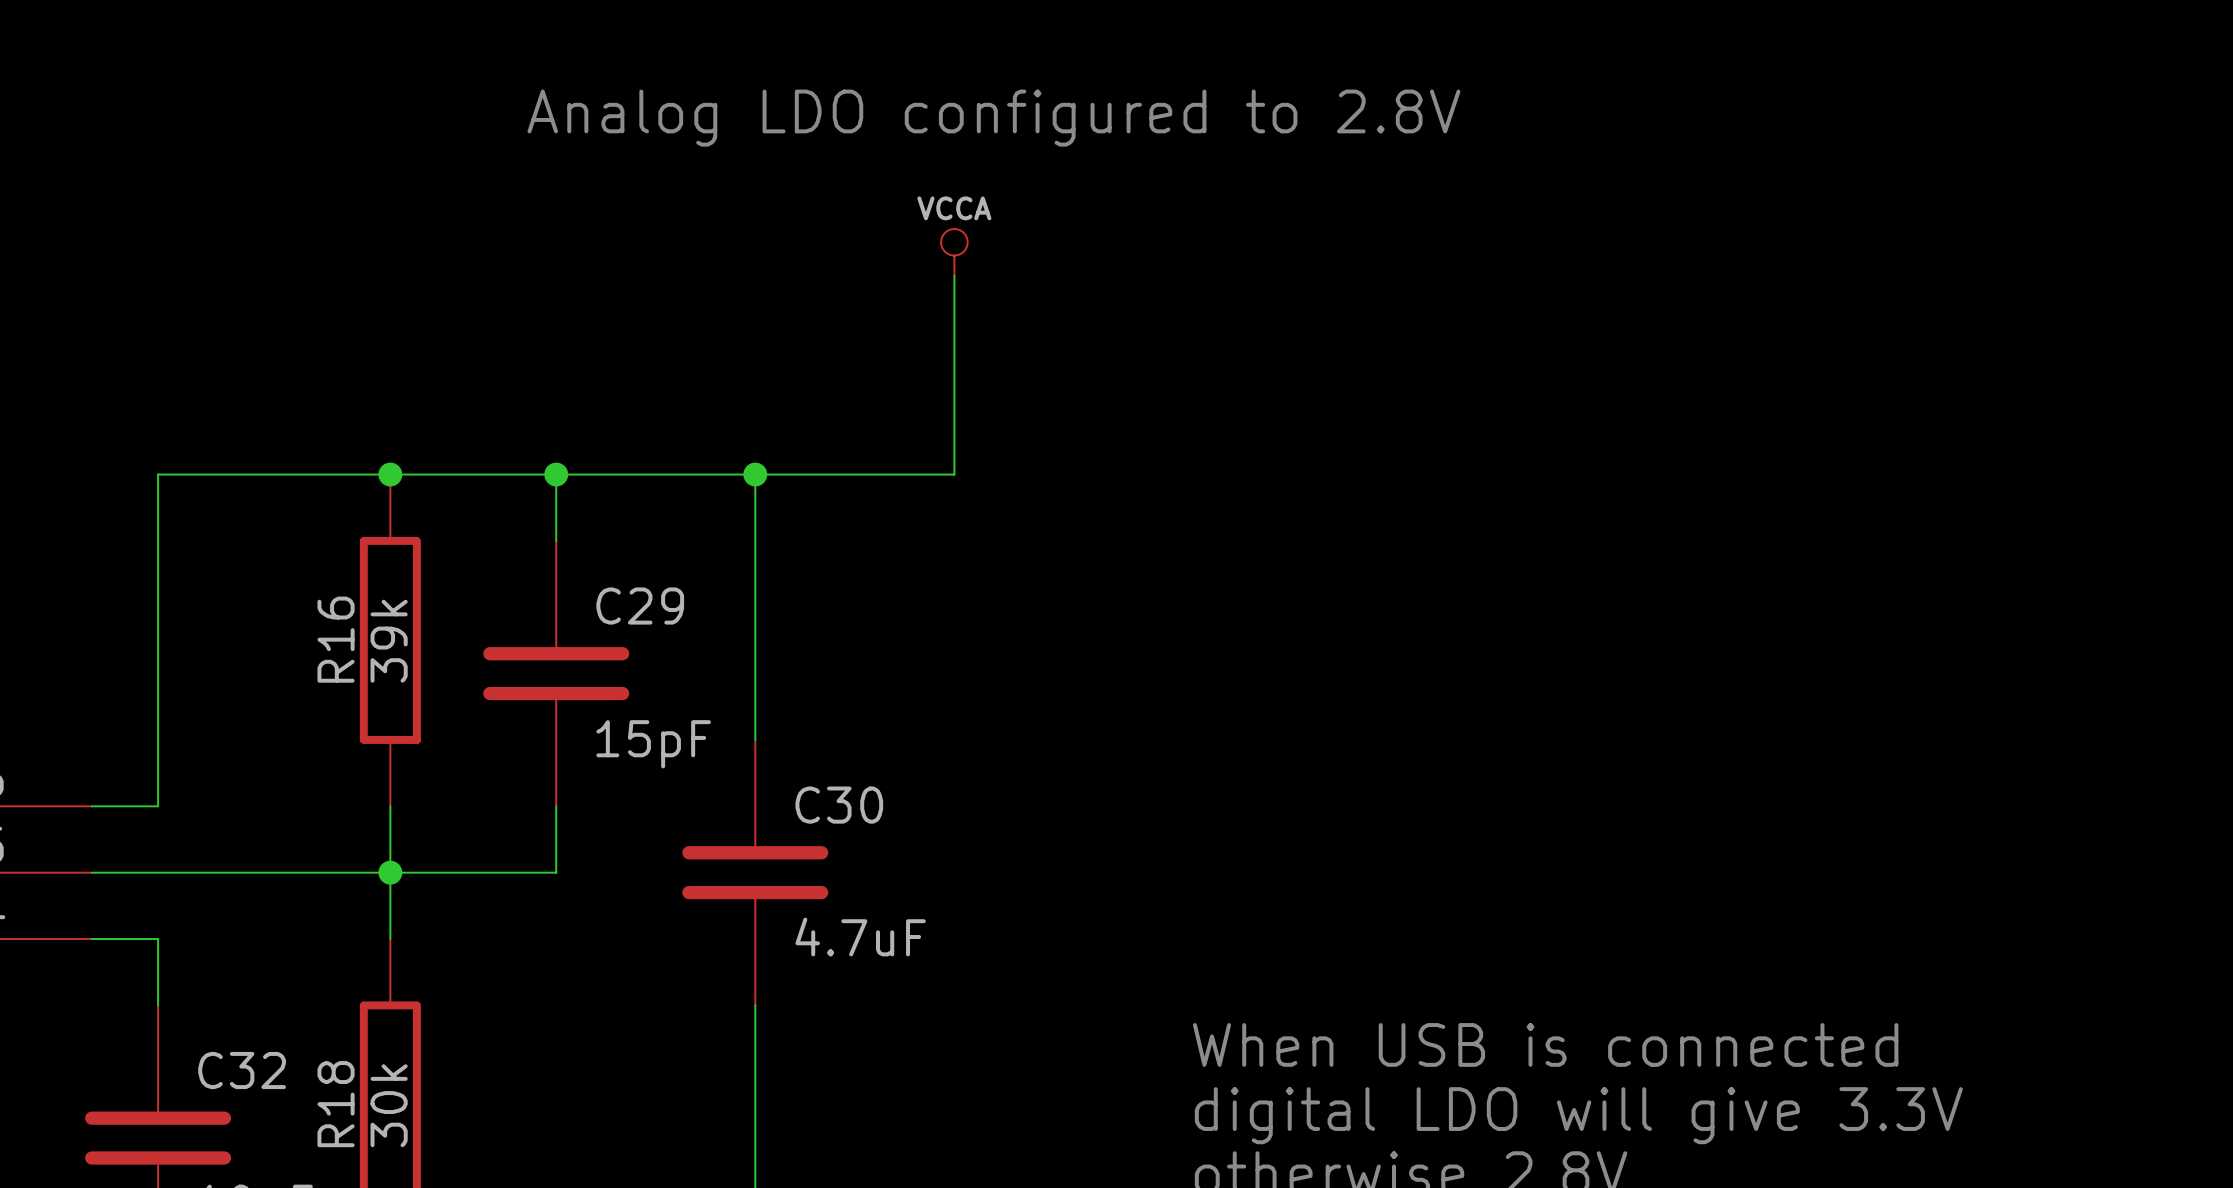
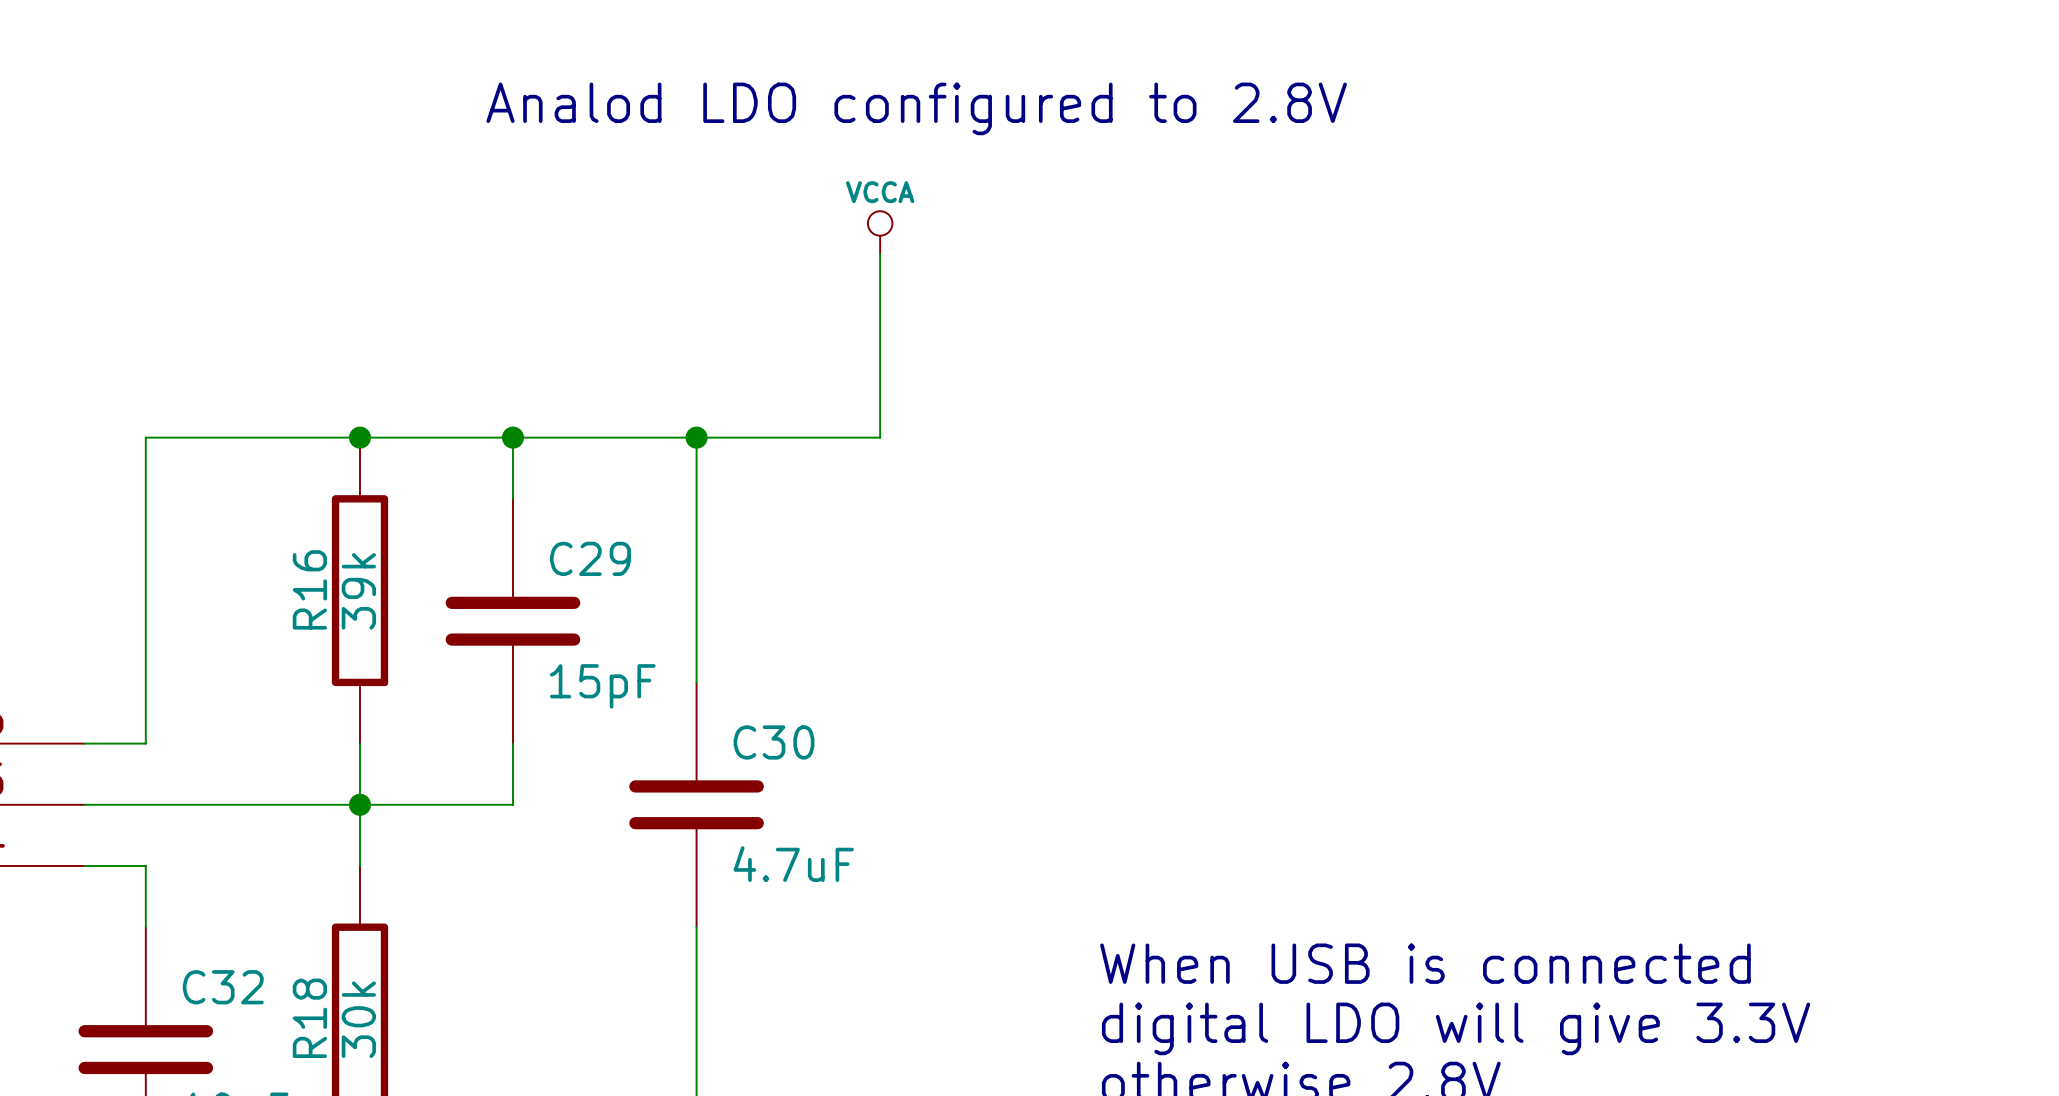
text: Analog LDO configured to 2.8V (993, 118) -> Analod LDO configured to 2.8V (916, 108)

